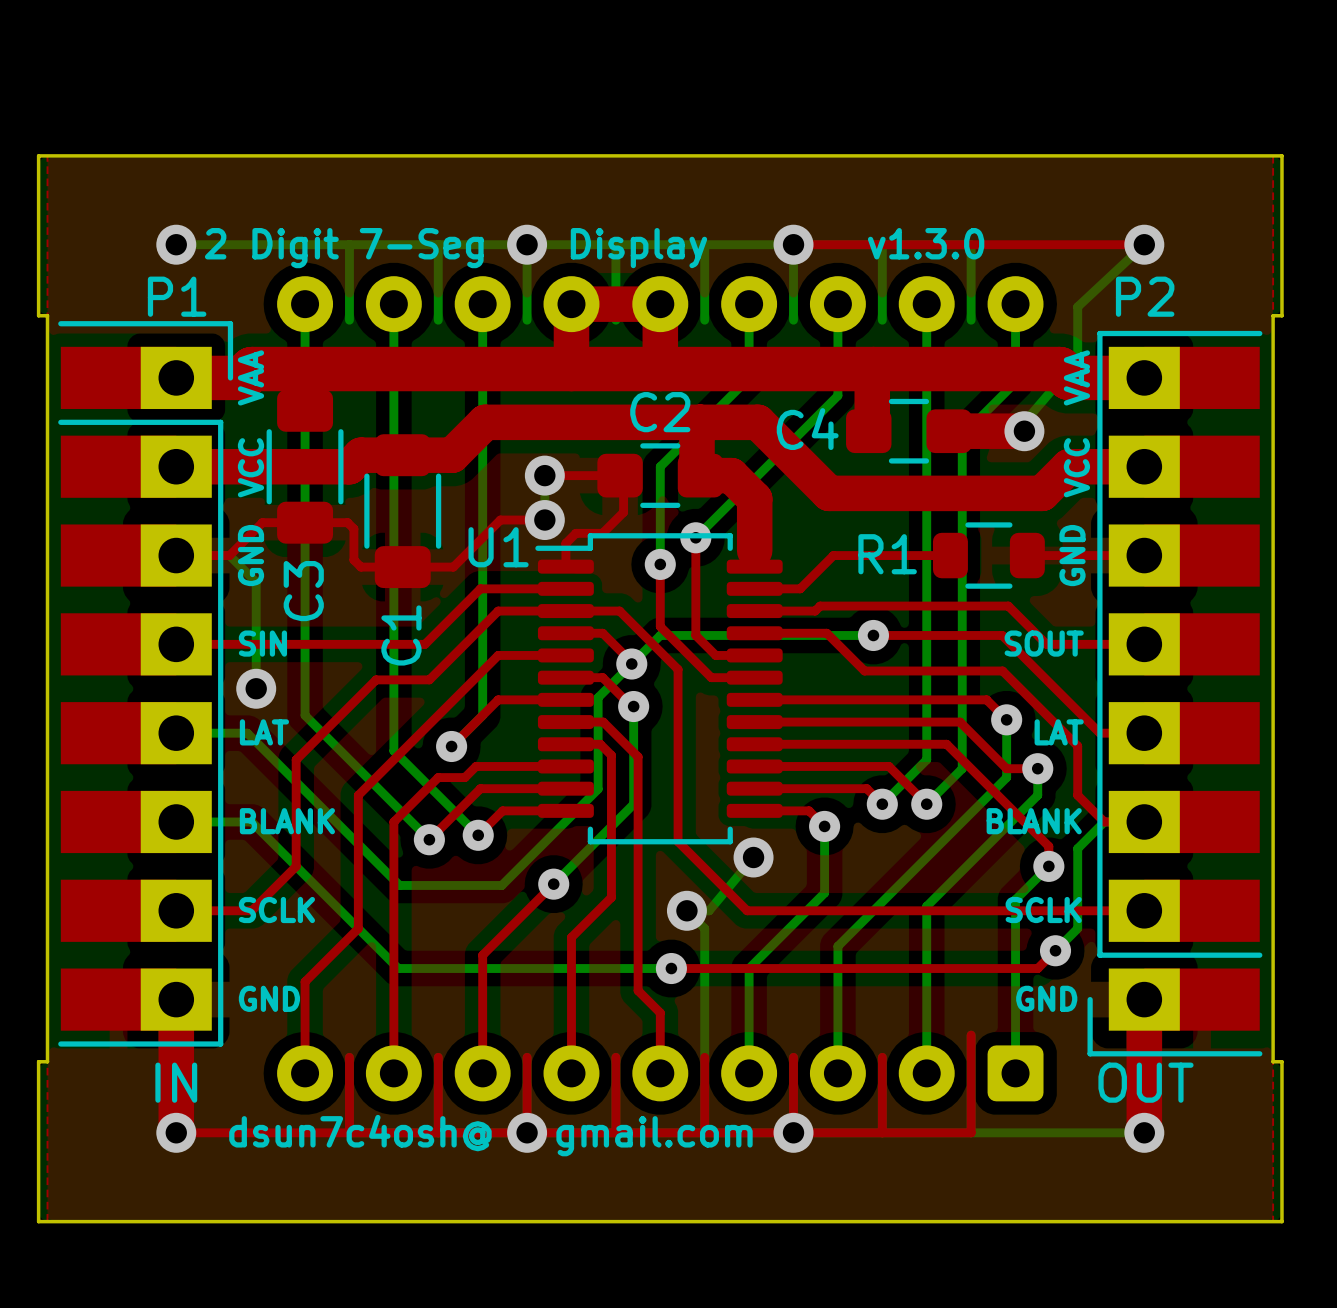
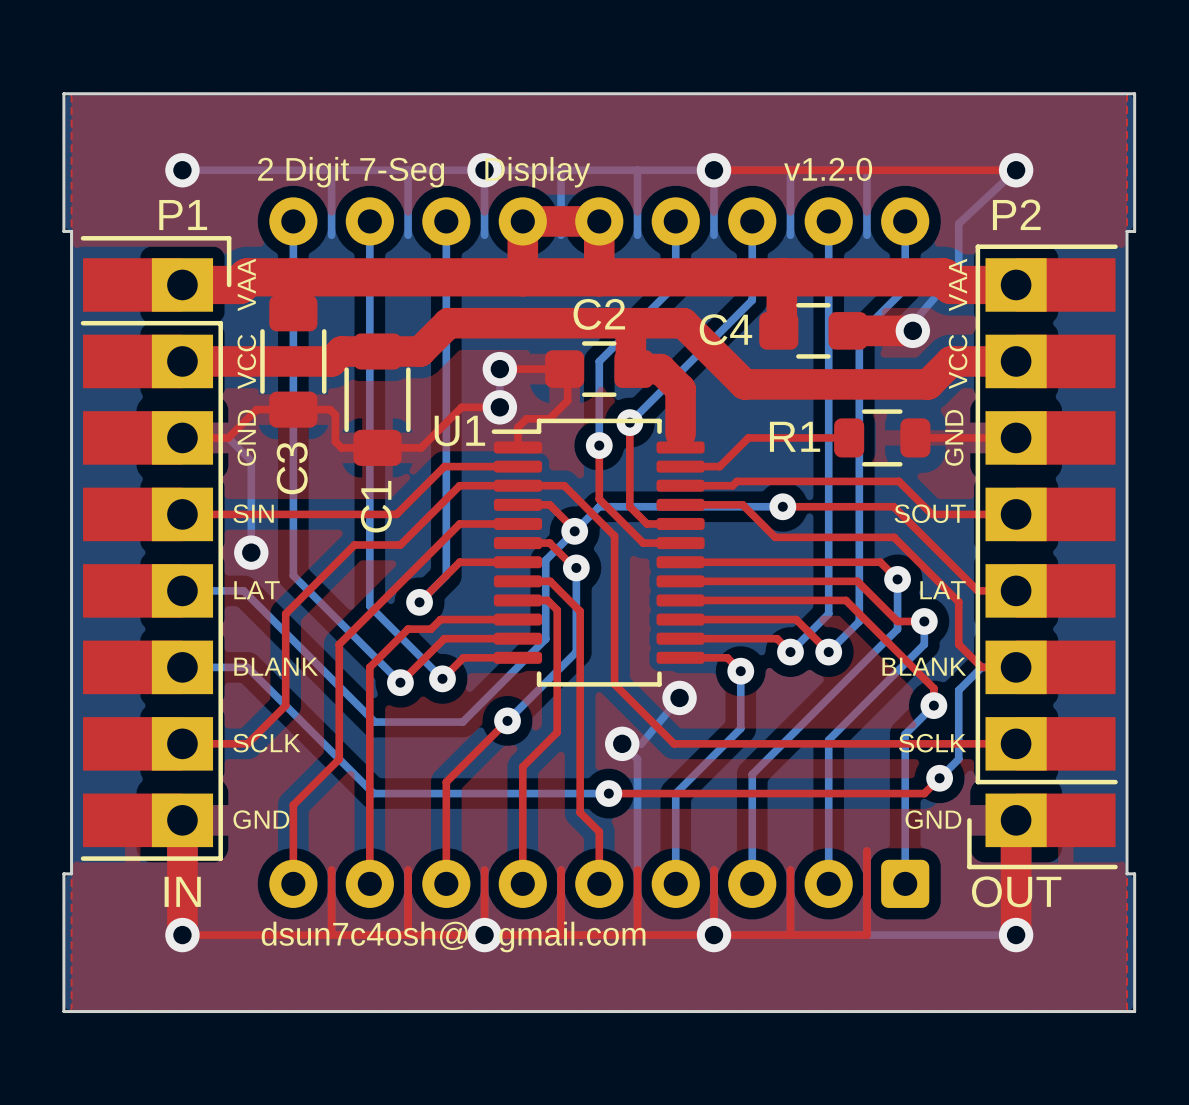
text: v1.3.0 (926, 243) -> v1.2.0 (828, 169)

